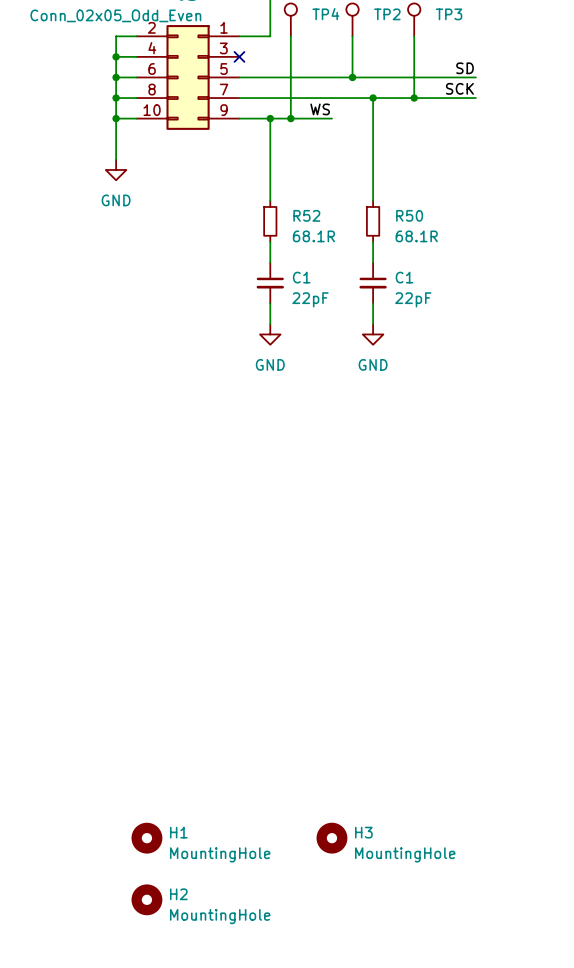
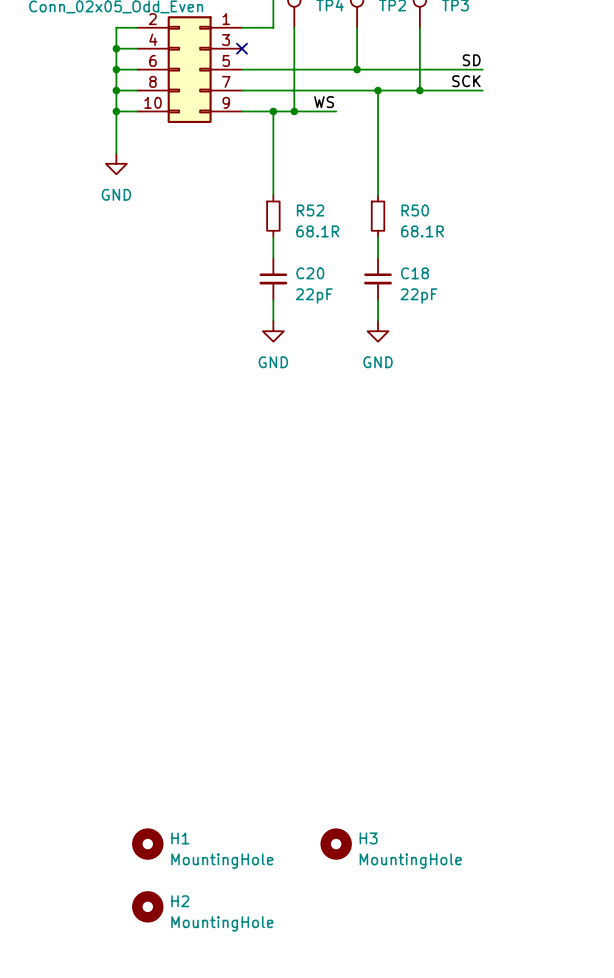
C1 name: C1 (301, 277) -> C20 (310, 273)
C1 name: C1 (404, 277) -> C18 (414, 273)

